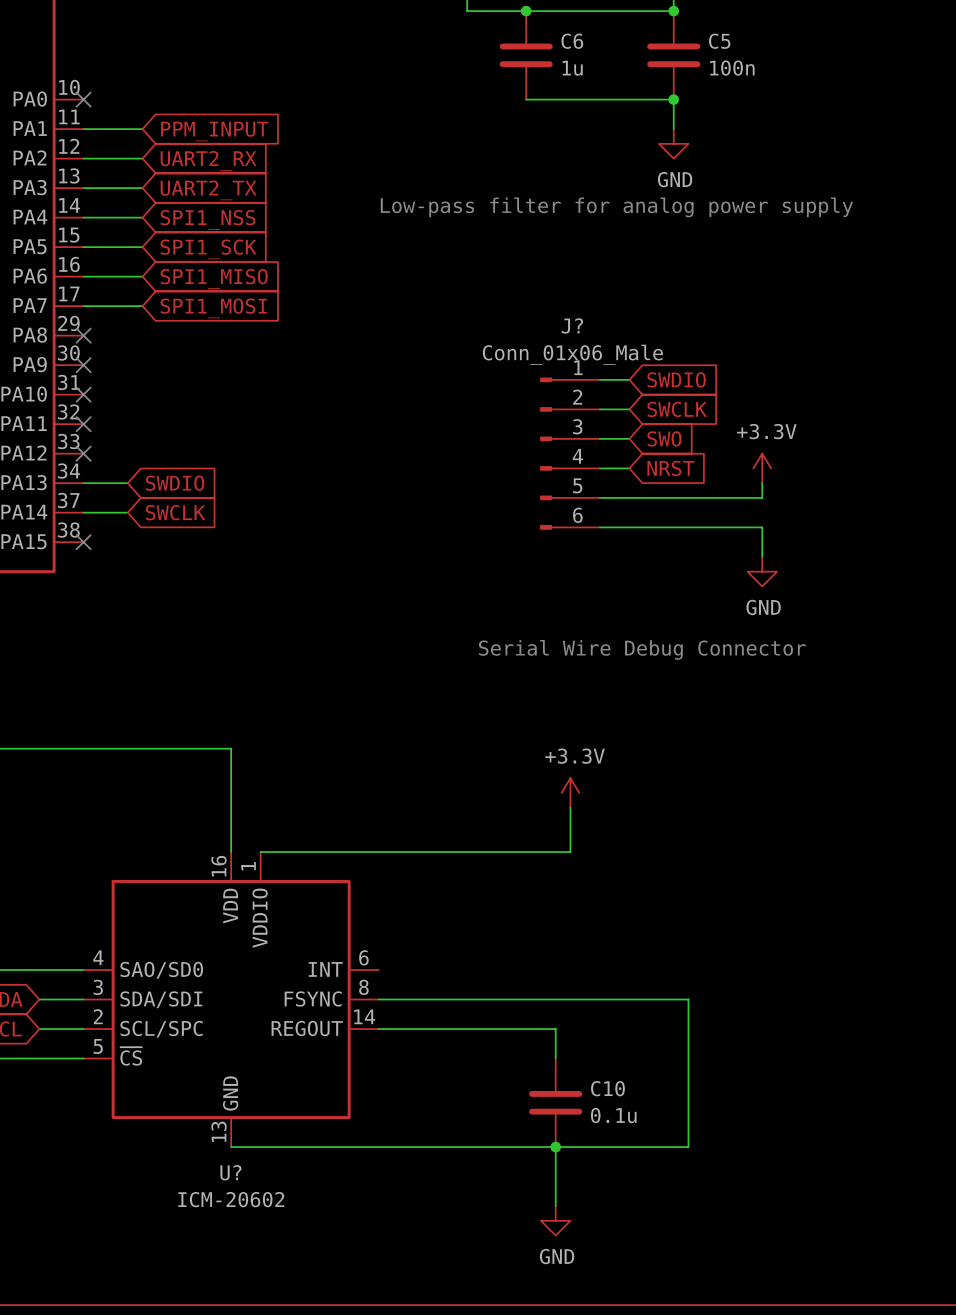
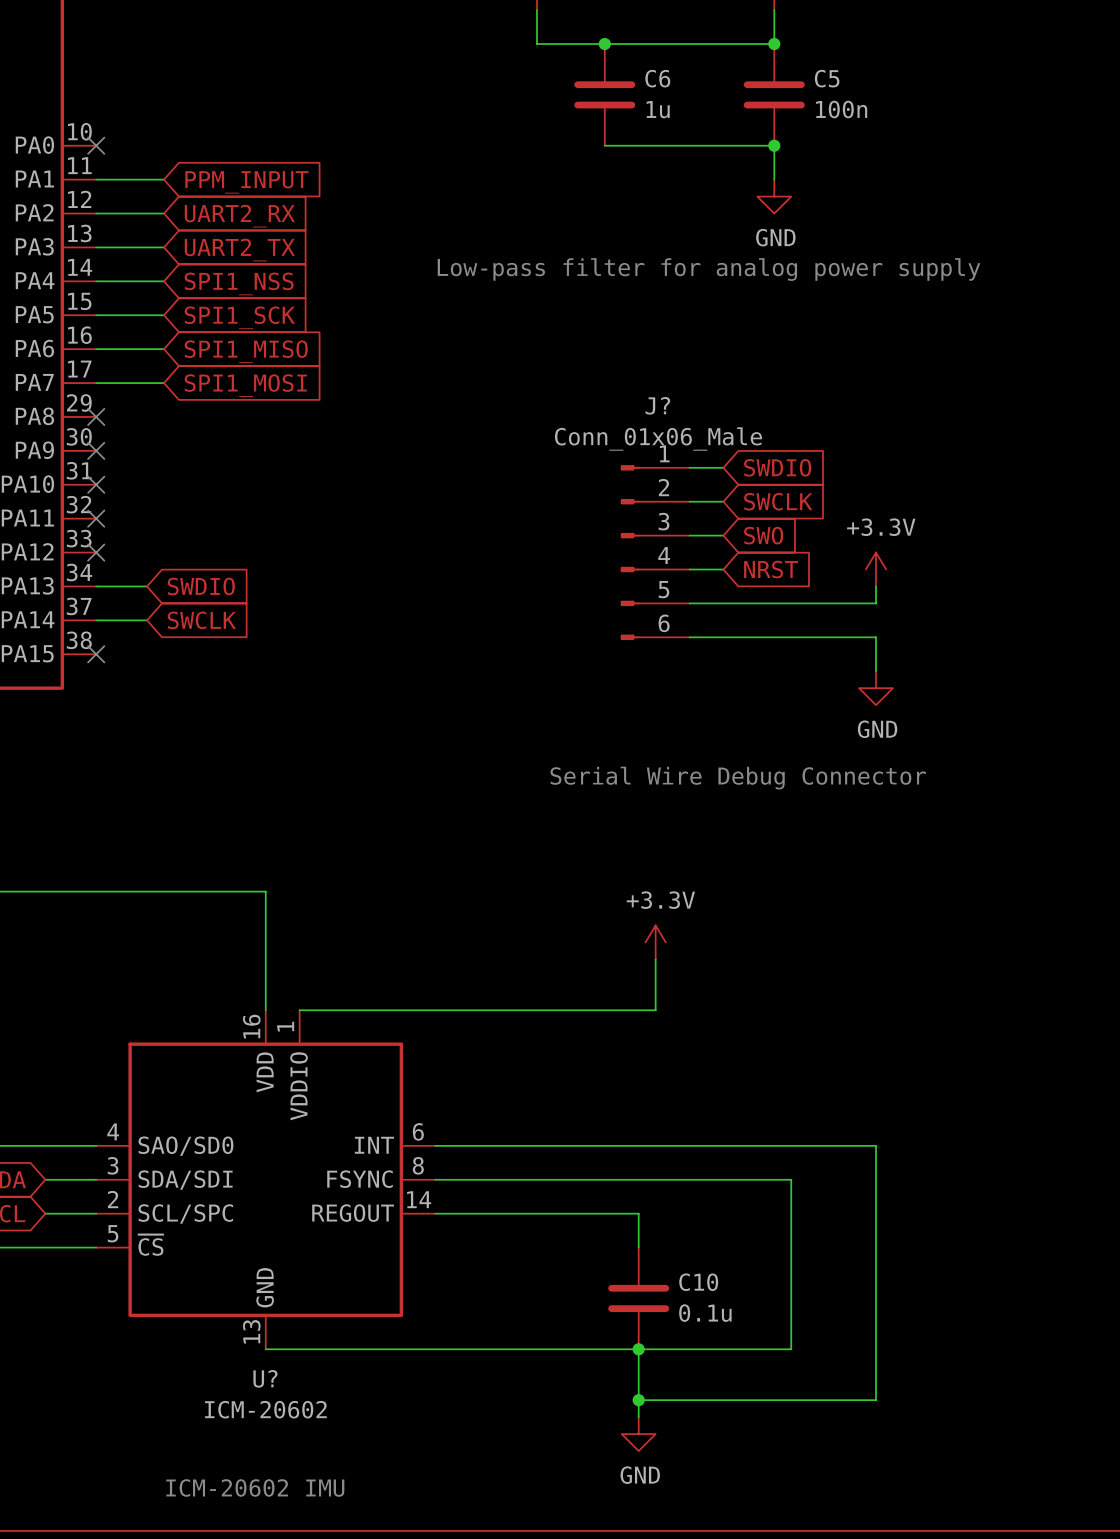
wire: none -> (435, 1145) (876, 1145) (876, 1400) (638, 1400)
junction: none -> (638, 1400)
text: none -> ICM-20602 IMU (255, 1487)

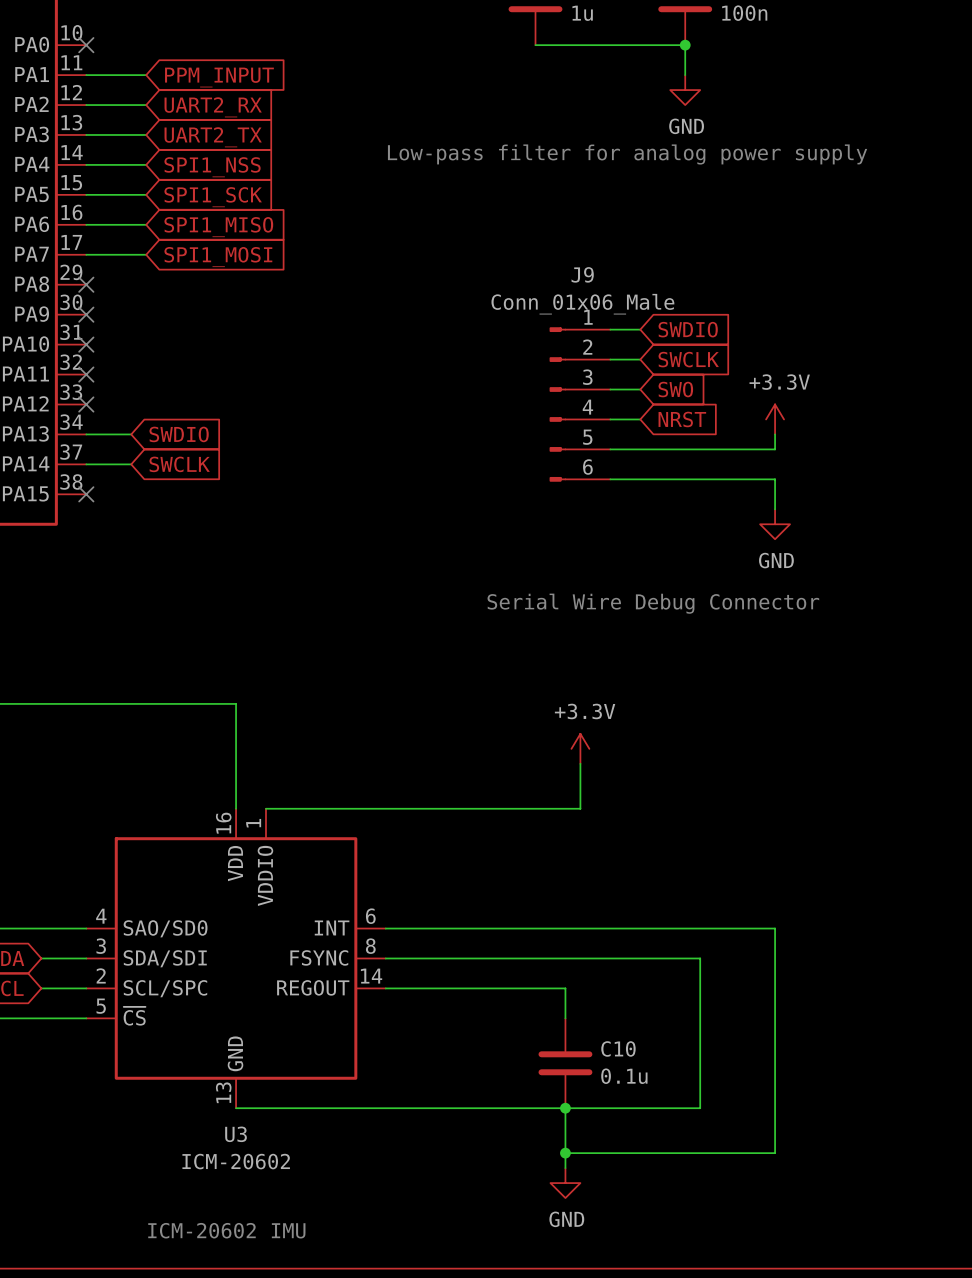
J? name: J? (657, 405) -> J9 (582, 274)
U? name: U? (265, 1378) -> U3 (236, 1134)

